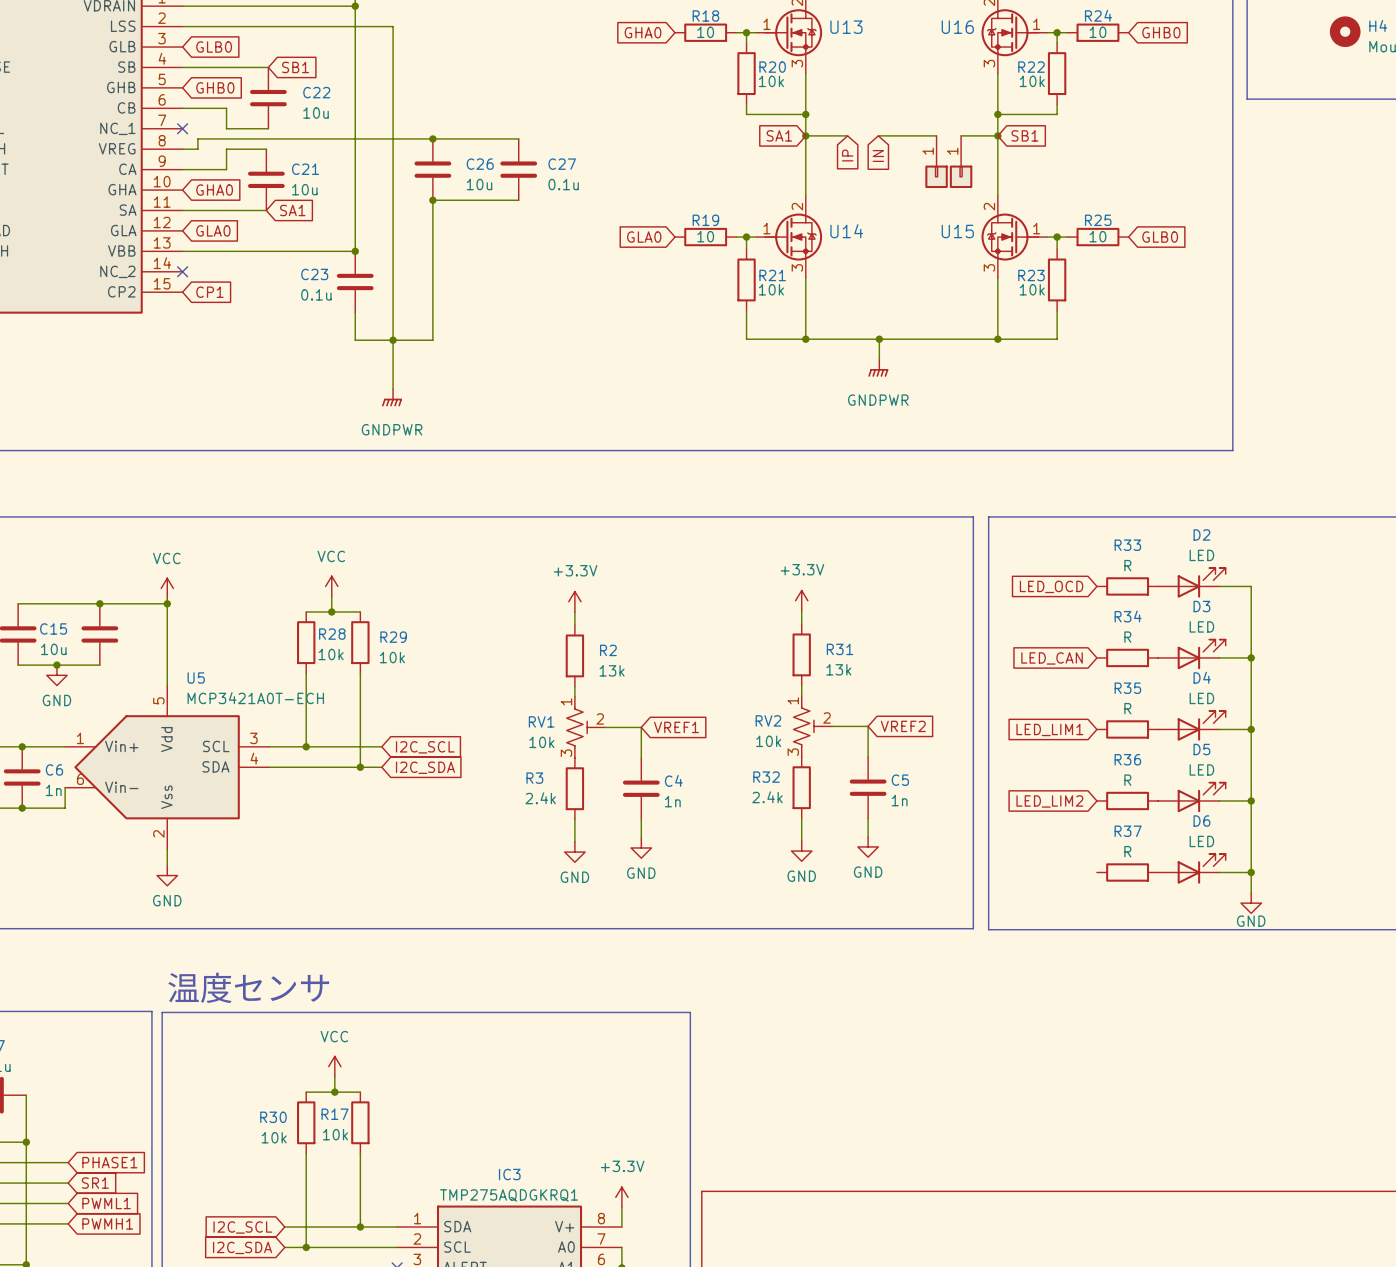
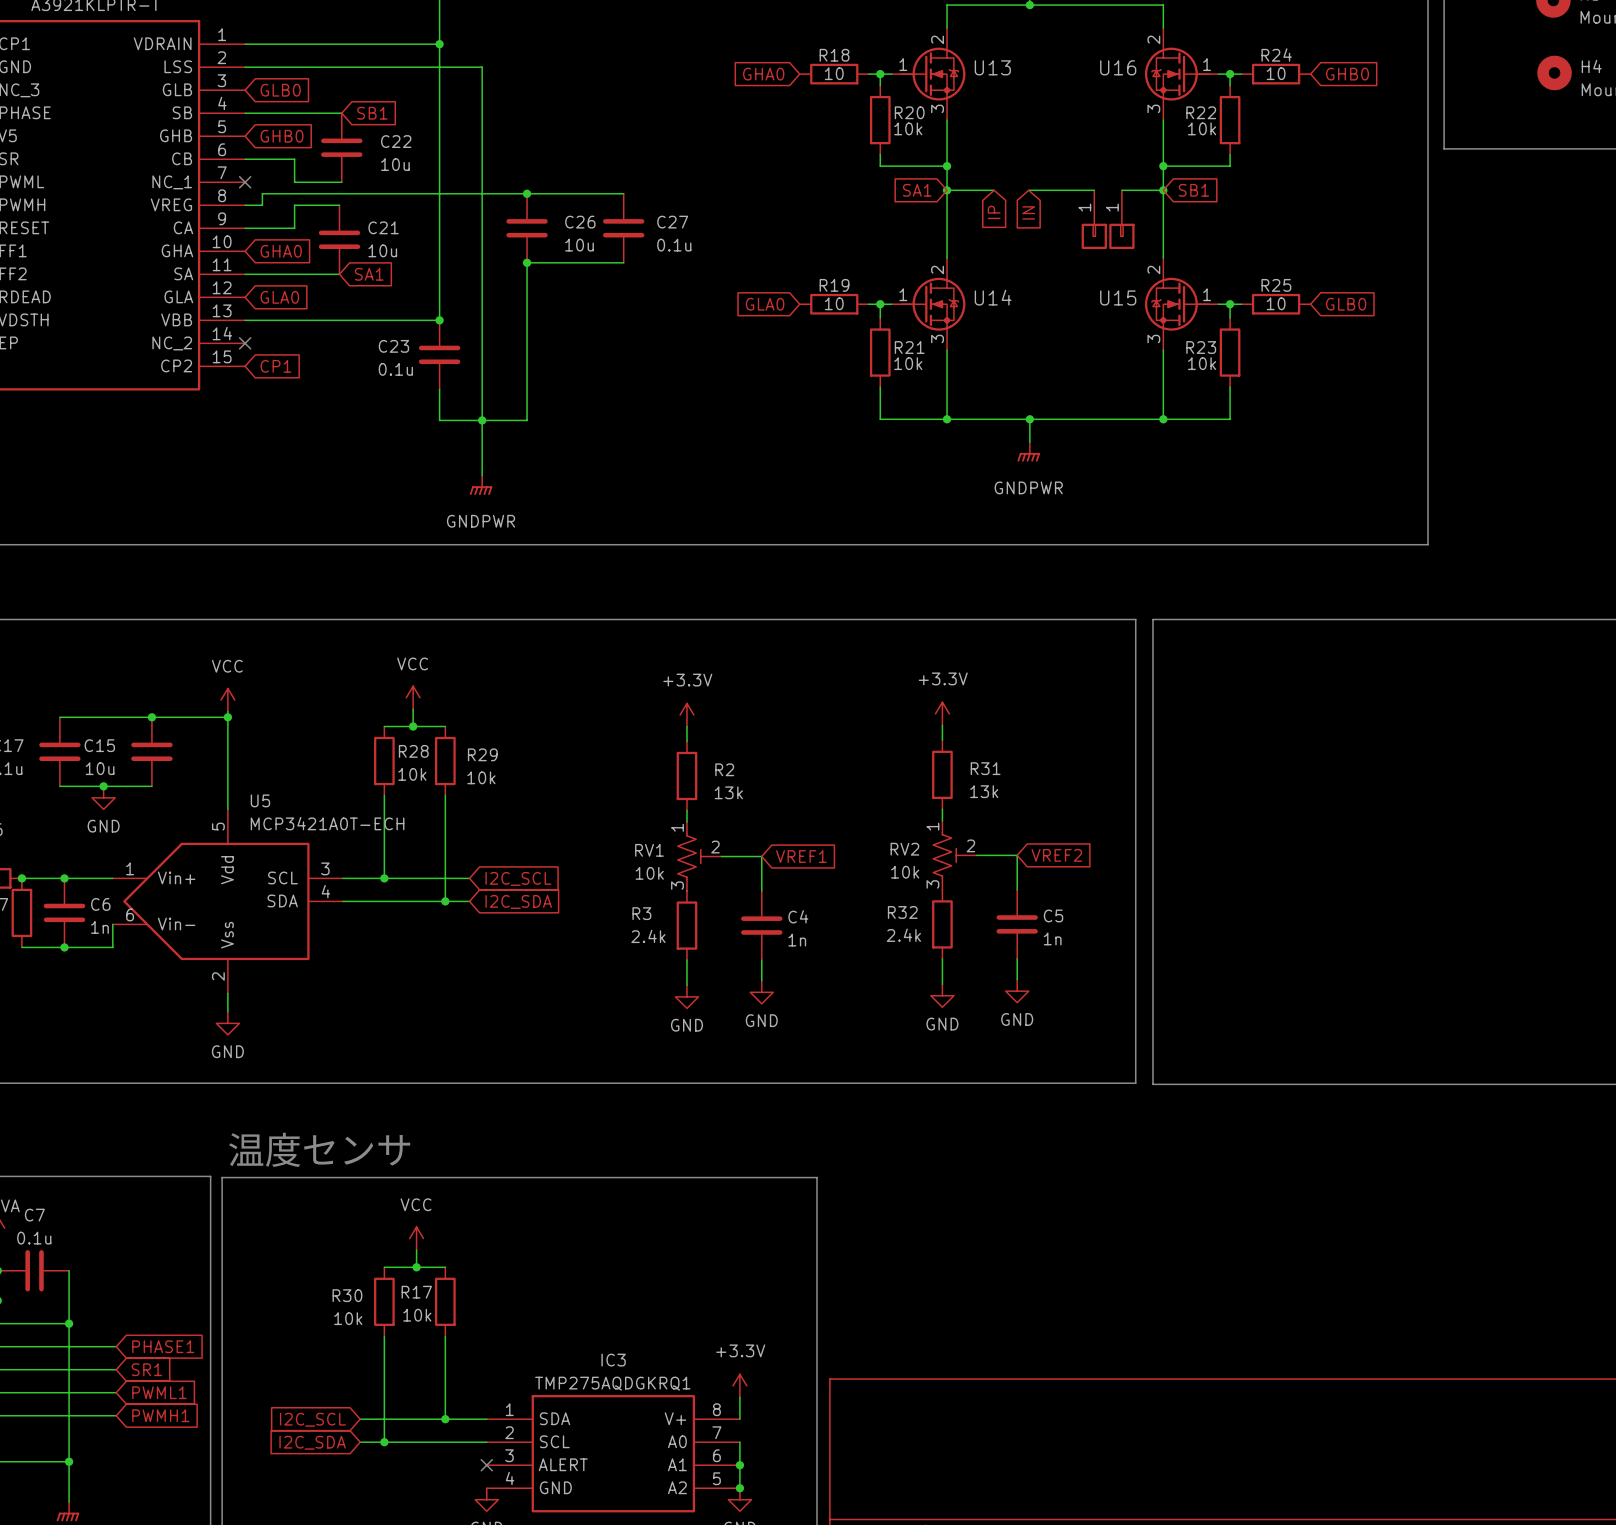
D2: LED (1191, 582) -> none
global label: LED_OCD (1051, 586) -> none
R33: R (1127, 586) -> none
wire: (1219, 586) (1251, 586) (1251, 892) -> none
D3: LED (1191, 654) -> none
R34: R (1127, 657) -> none
wire: (1219, 657) (1251, 657) -> none
junction: (1251, 657) -> none
global label: LED_CAN (1052, 658) -> none
D4: LED (1191, 725) -> none
global label: LED_LIM1 (1049, 729) -> none
R35: R (1127, 729) -> none
wire: (1219, 729) (1251, 729) -> none
junction: (1251, 729) -> none
D5: LED (1191, 797) -> none
R36: R (1127, 800) -> none
wire: (1219, 800) (1251, 800) -> none
junction: (1251, 800) -> none
global label: LED_LIM2 (1049, 801) -> none
D6: LED (1191, 868) -> none
R37: R (1127, 872) -> none
wire: (1219, 872) (1251, 872) -> none
junction: (1251, 872) -> none
power symbol: GND (1251, 903) -> none

